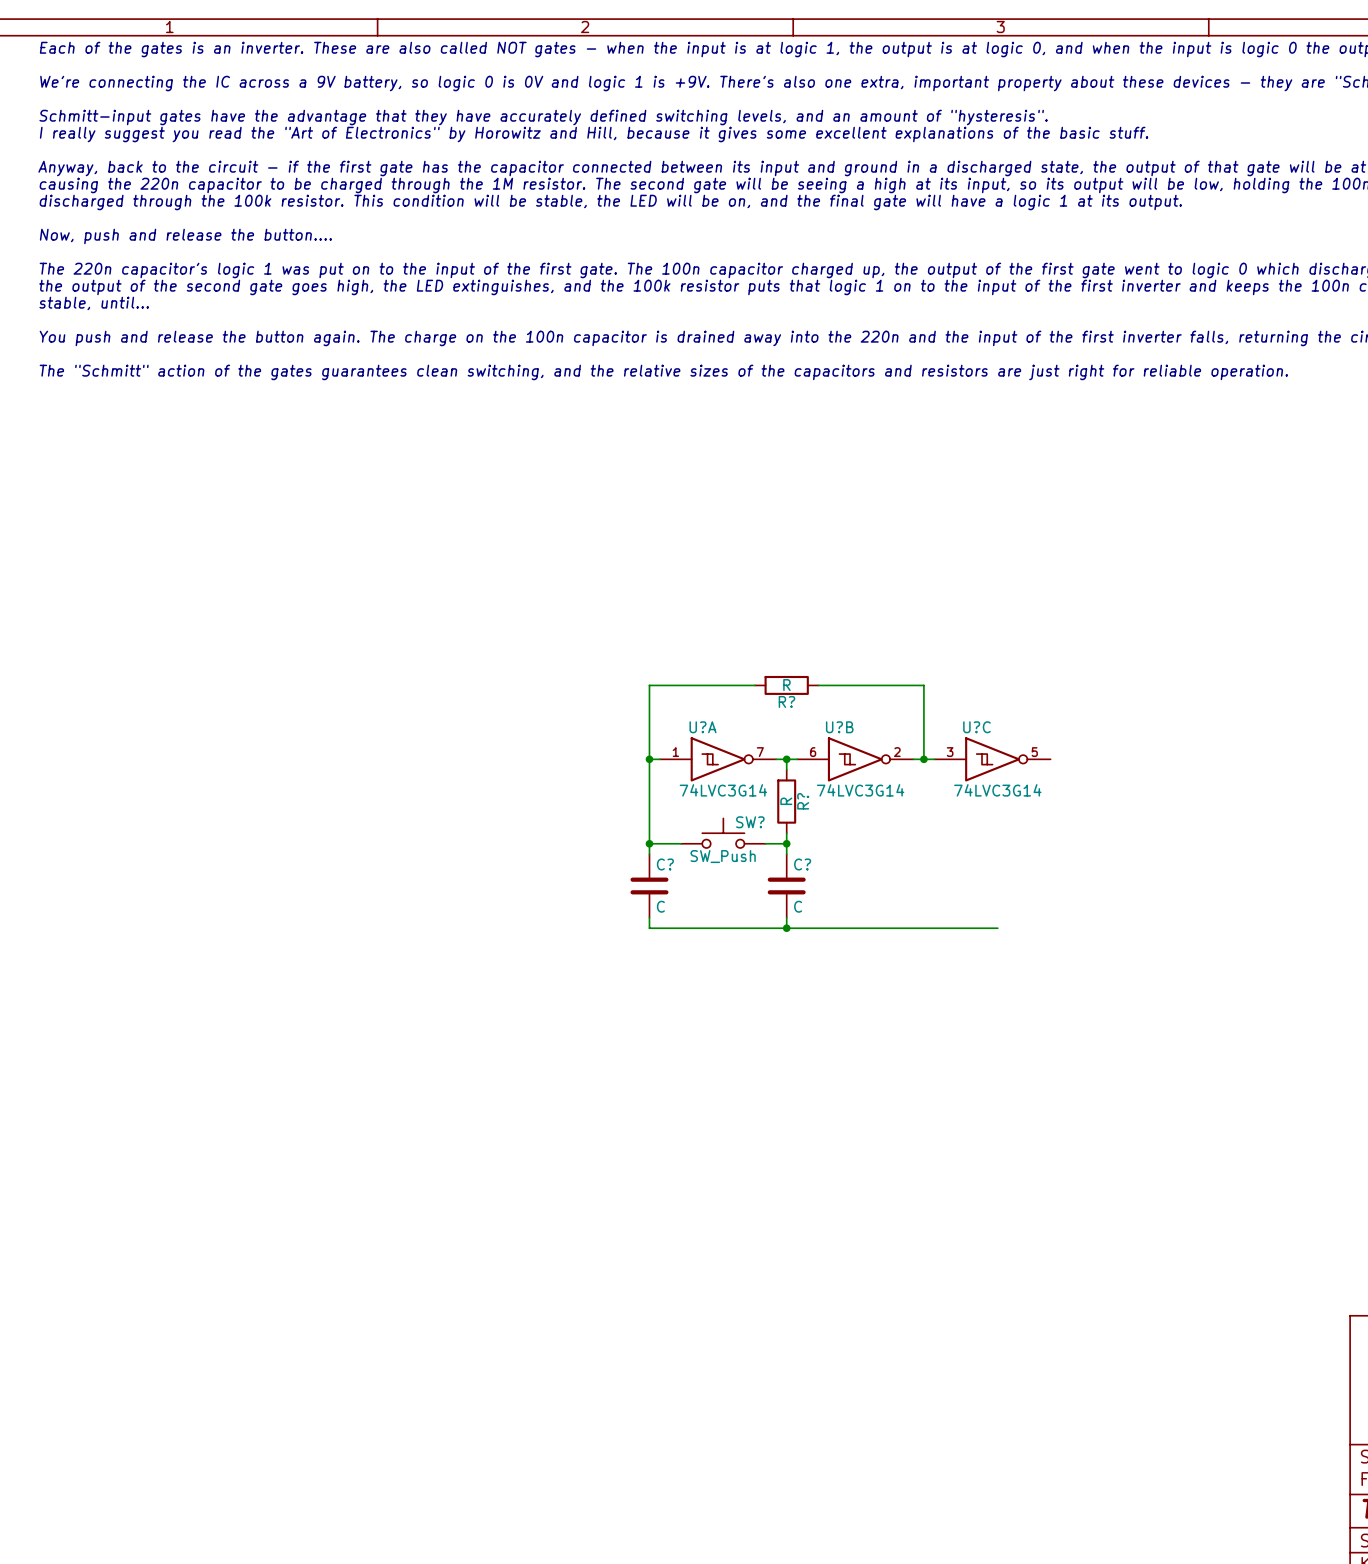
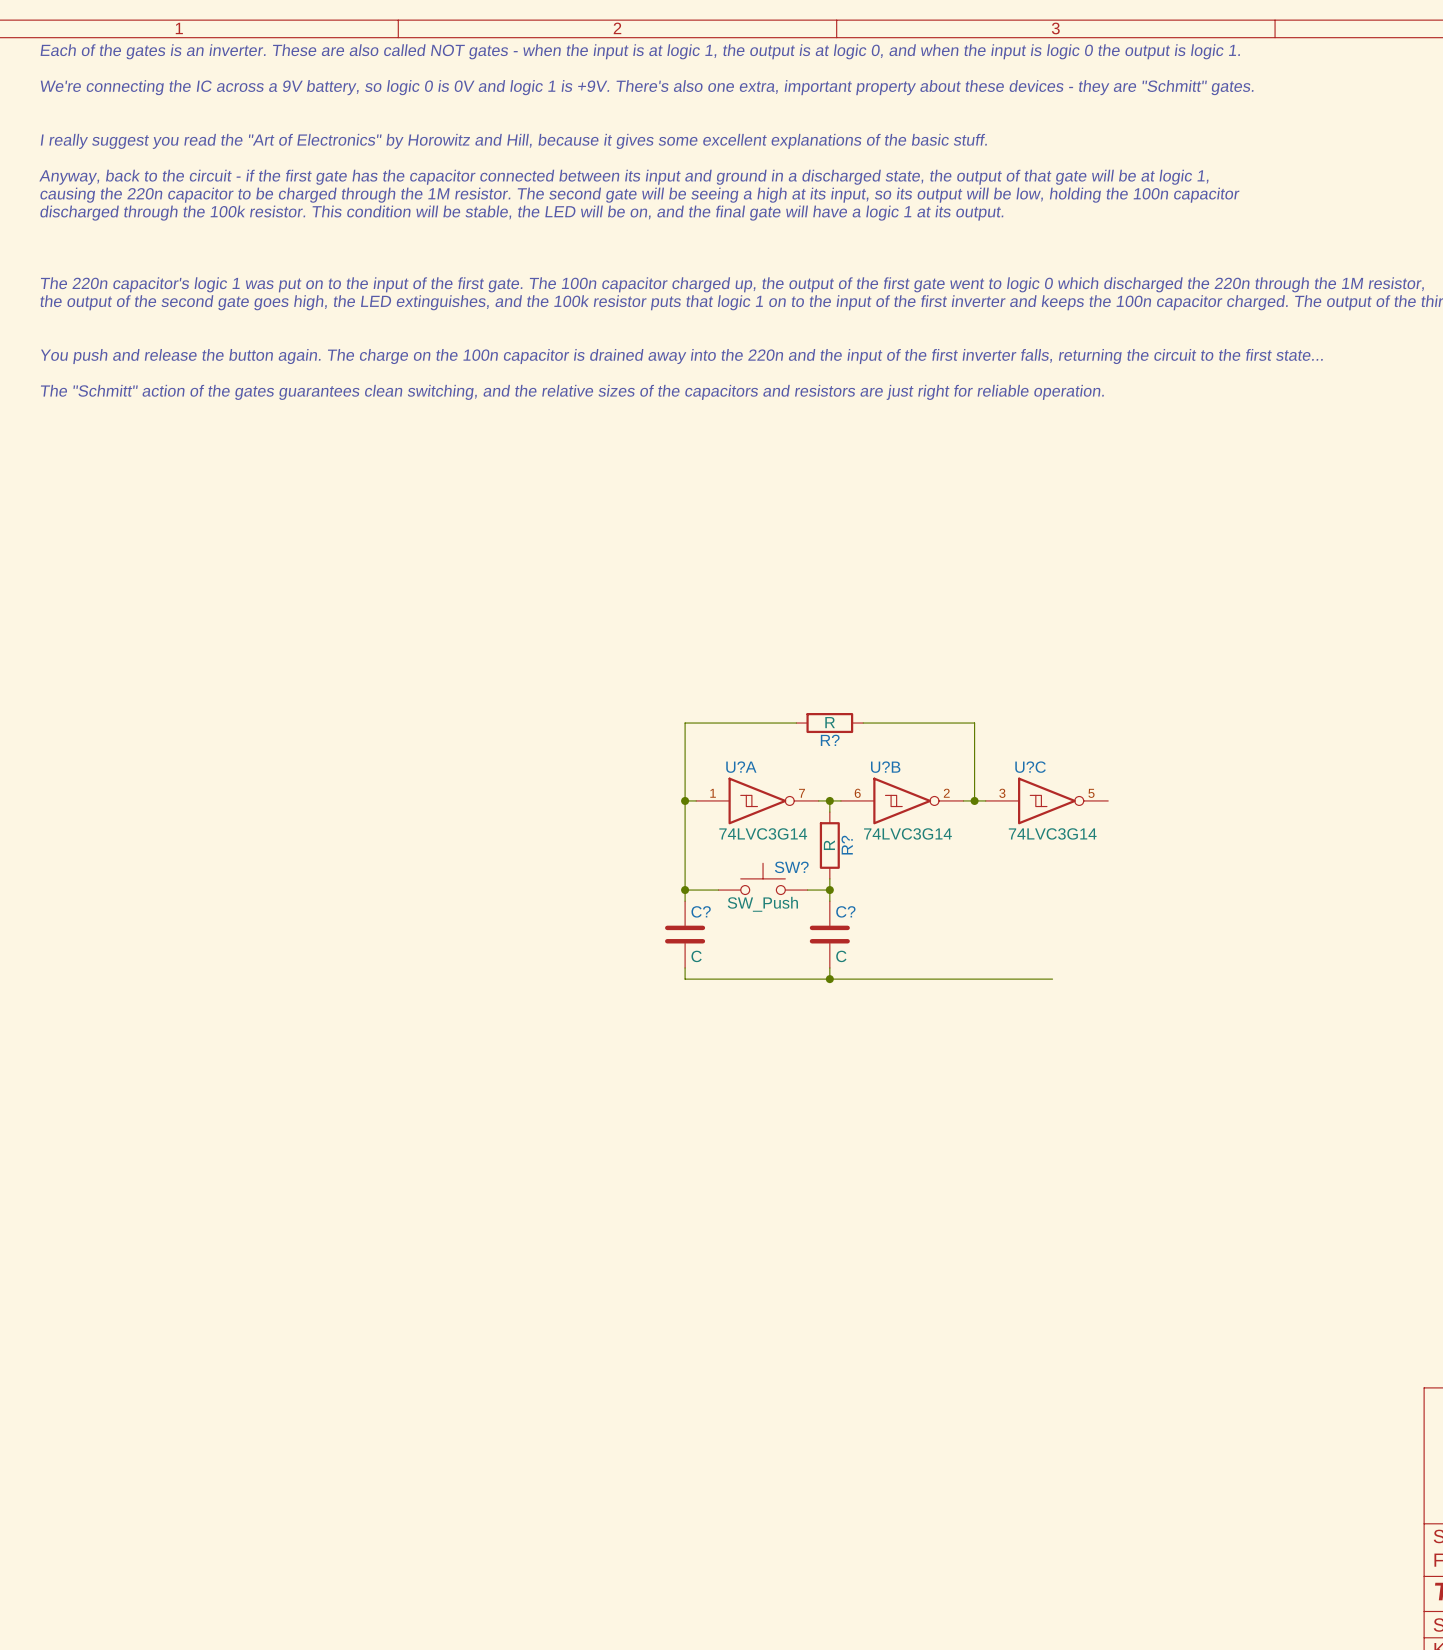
text: Schmitt-input gates have the advantage that they have accurately defined switching levels, and an amount of "hysteresis". (543, 117) -> none
text: Now, push and release the button.... (185, 236) -> none
text: stable, until... (94, 303) -> none

